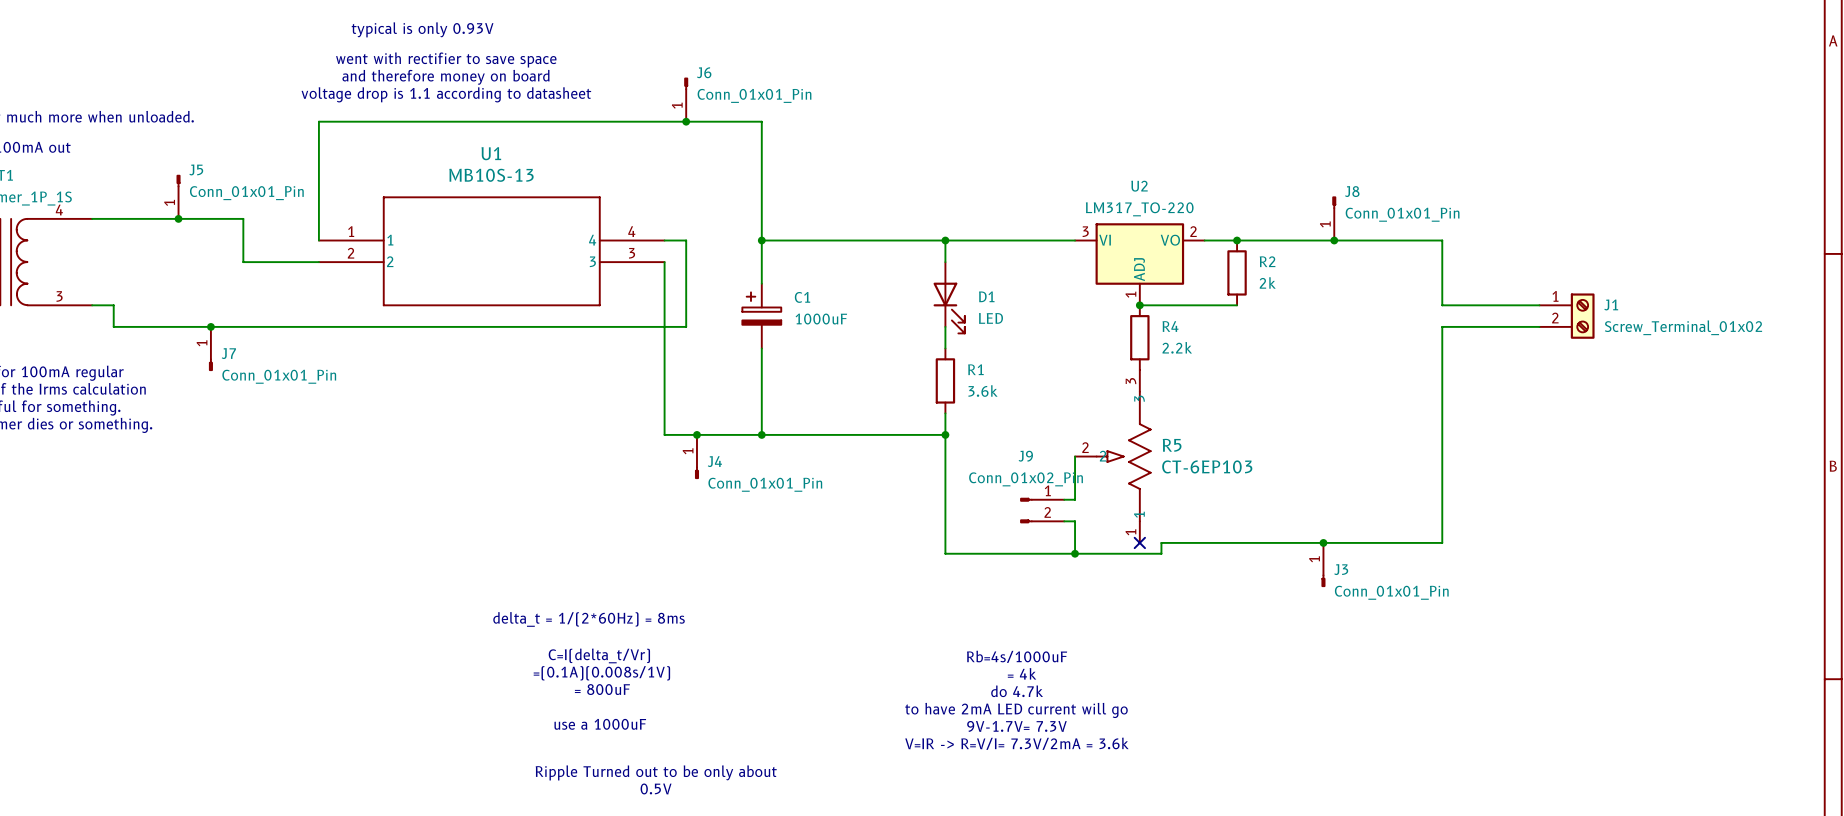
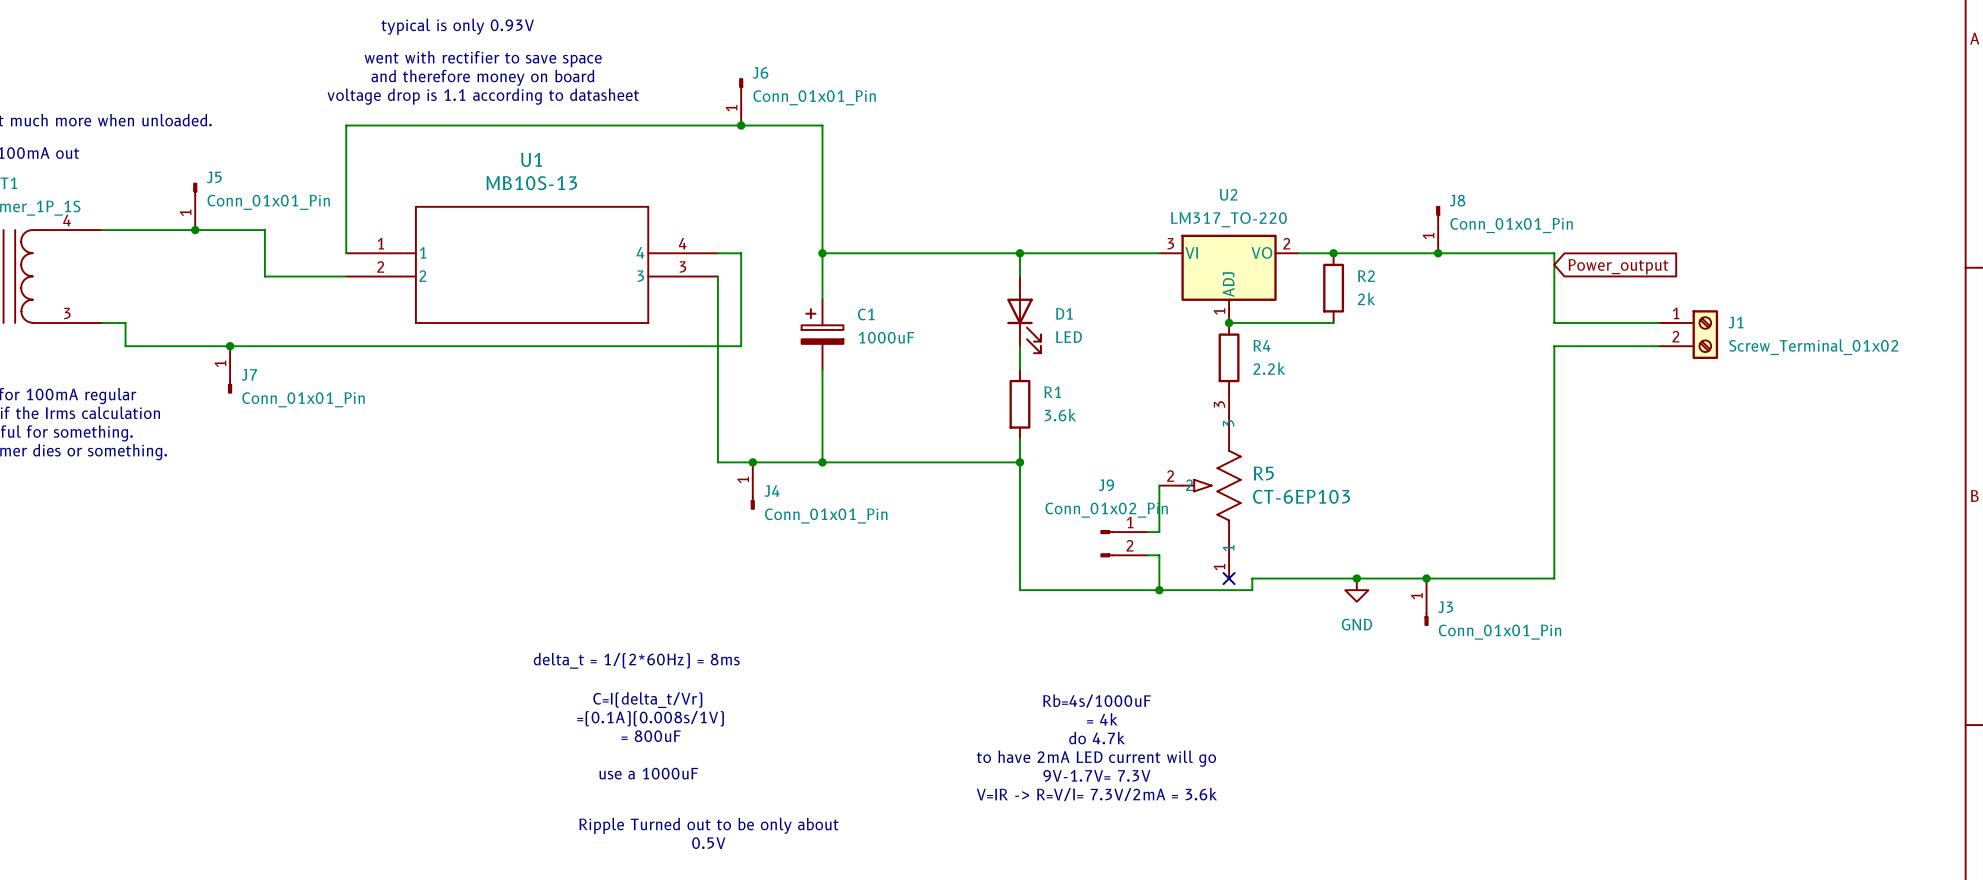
global label: none -> Power_output (1618, 266)
junction: none -> (1356, 578)
power symbol: none -> GND (1356, 590)

